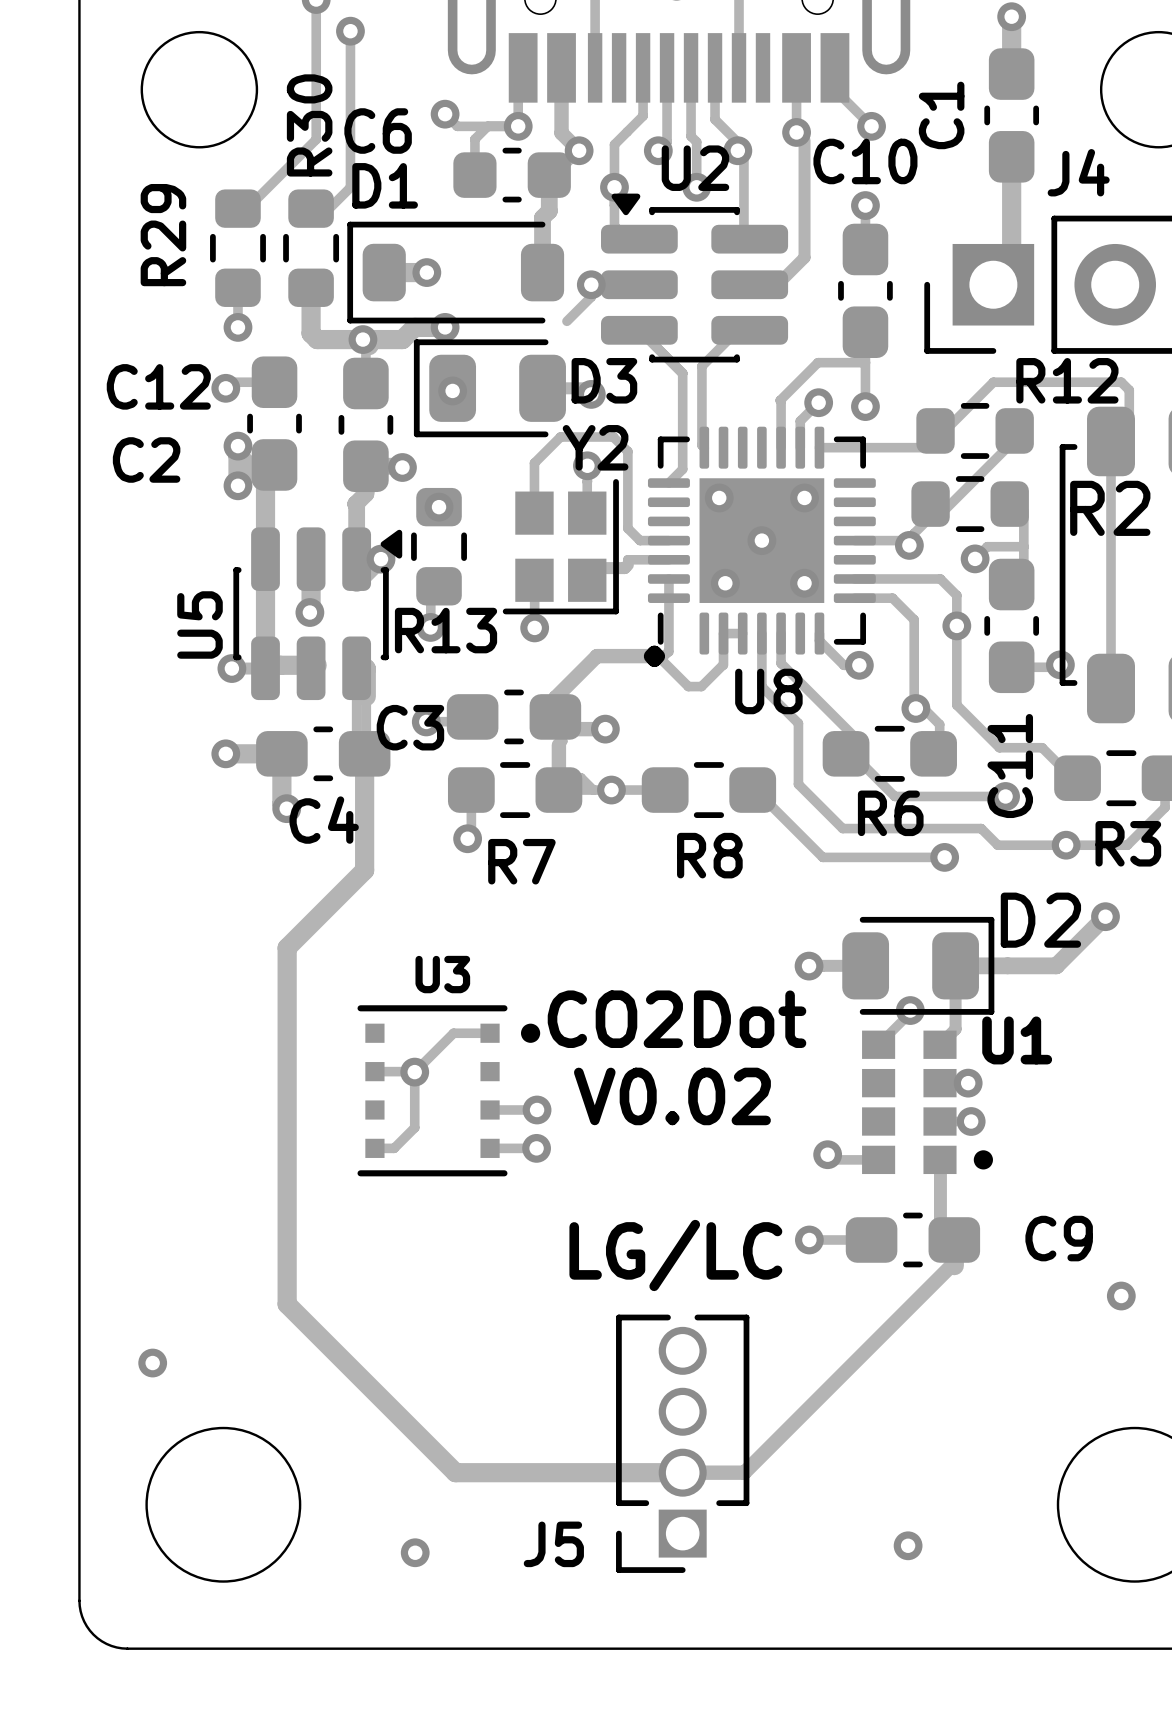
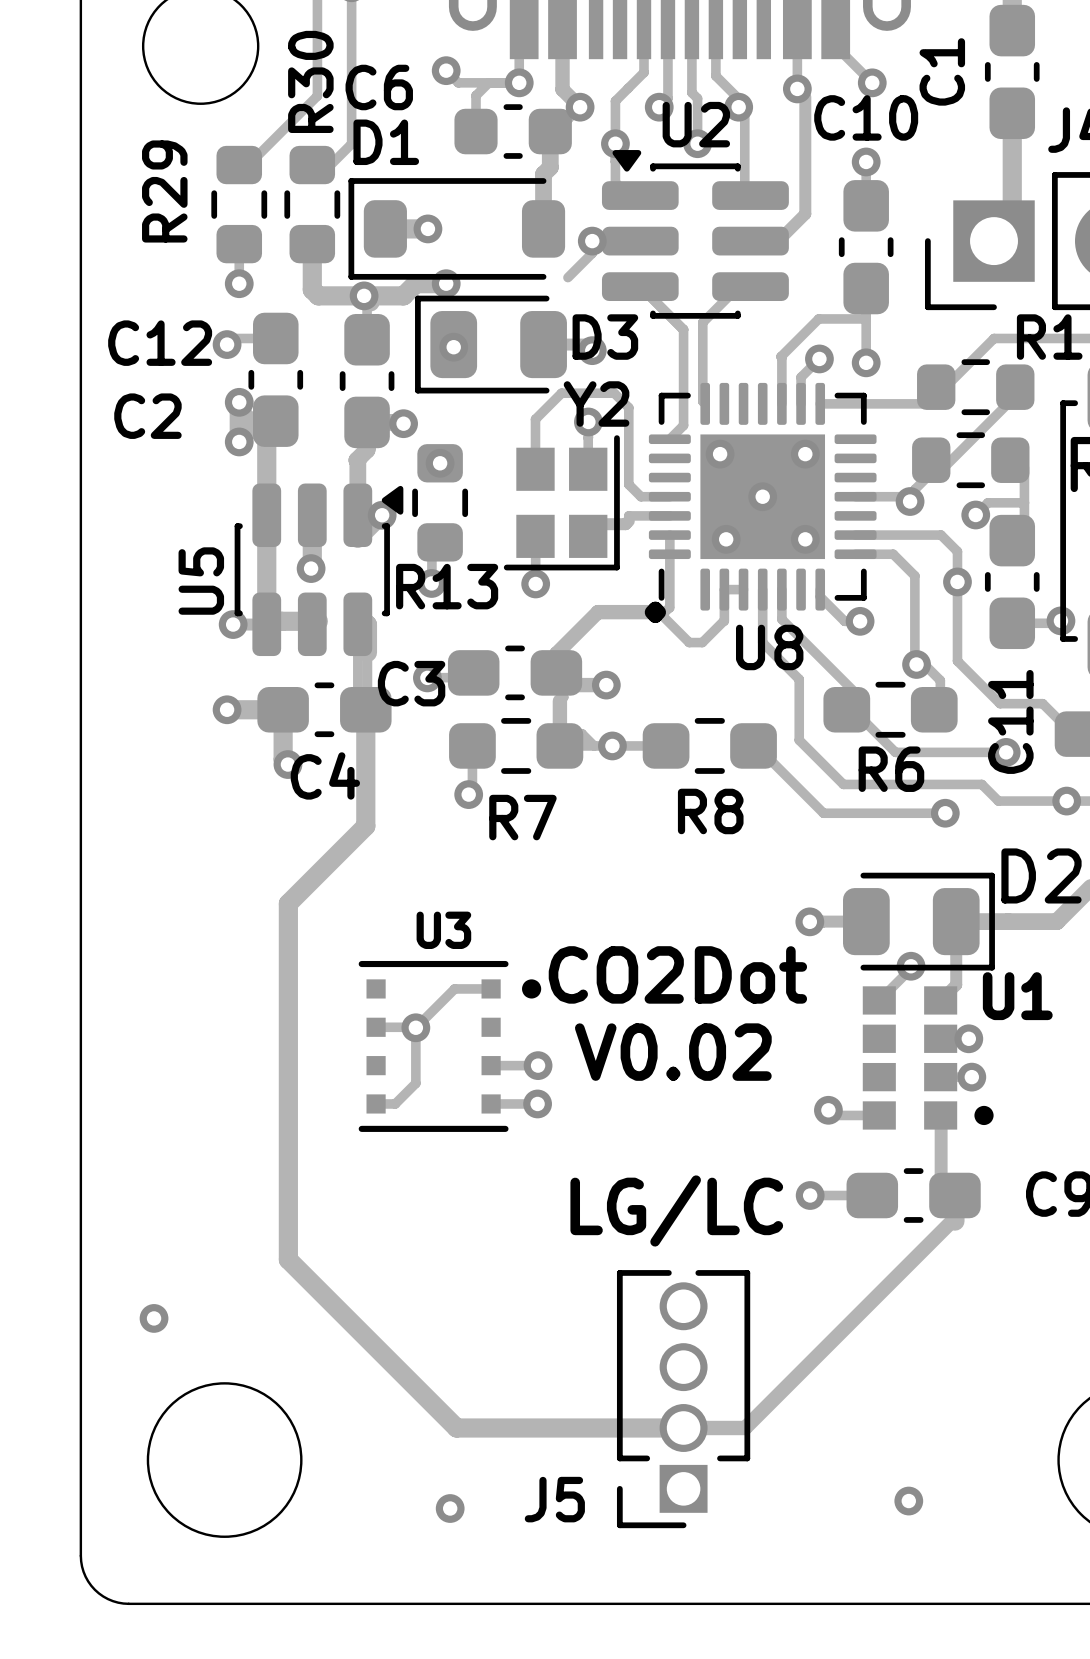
via position: (415, 1552) -> (450, 1508)

